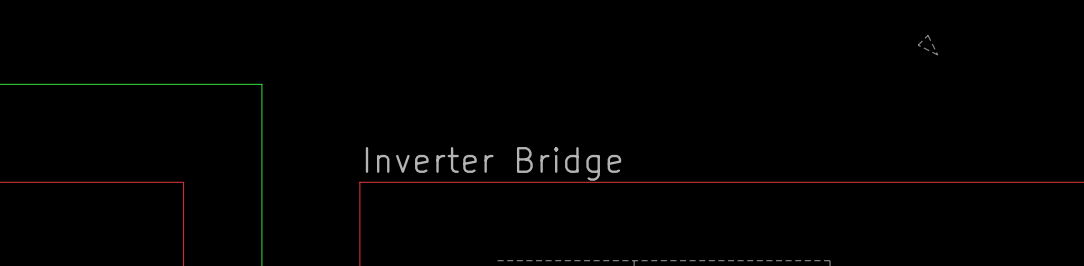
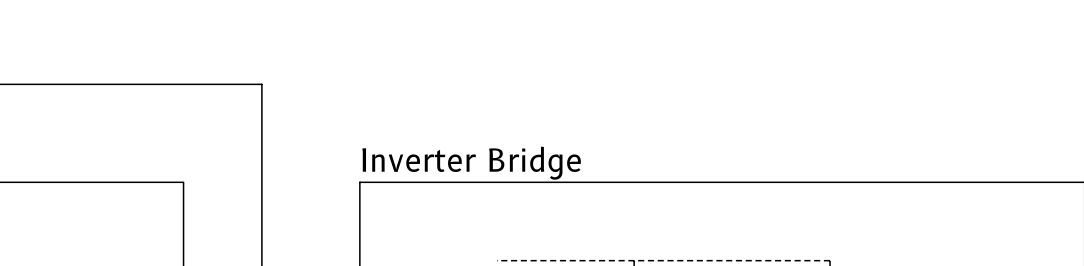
line: (927, 35) (937, 54) (918, 45) (927, 35) -> none

